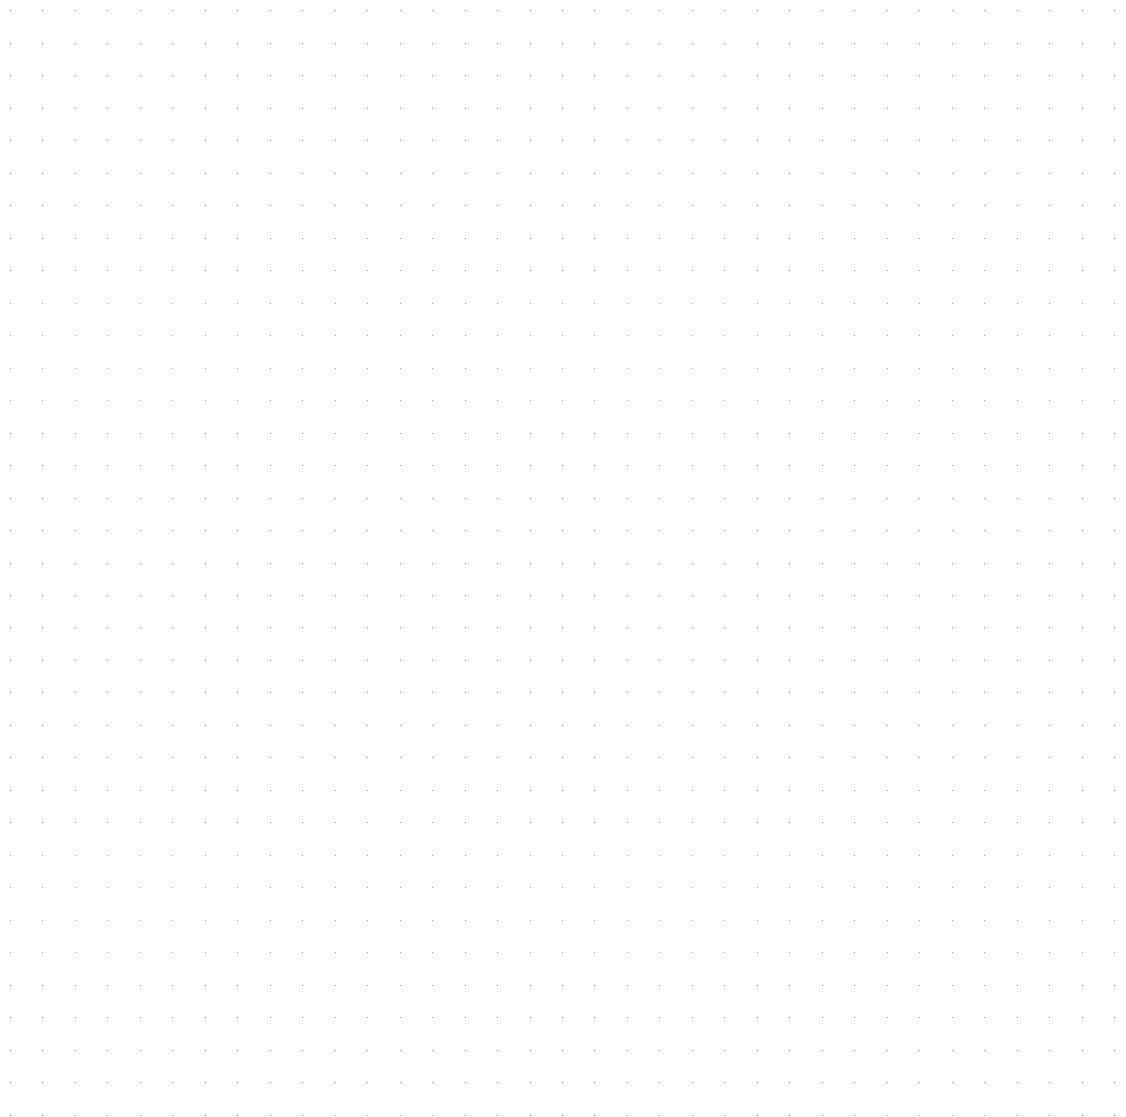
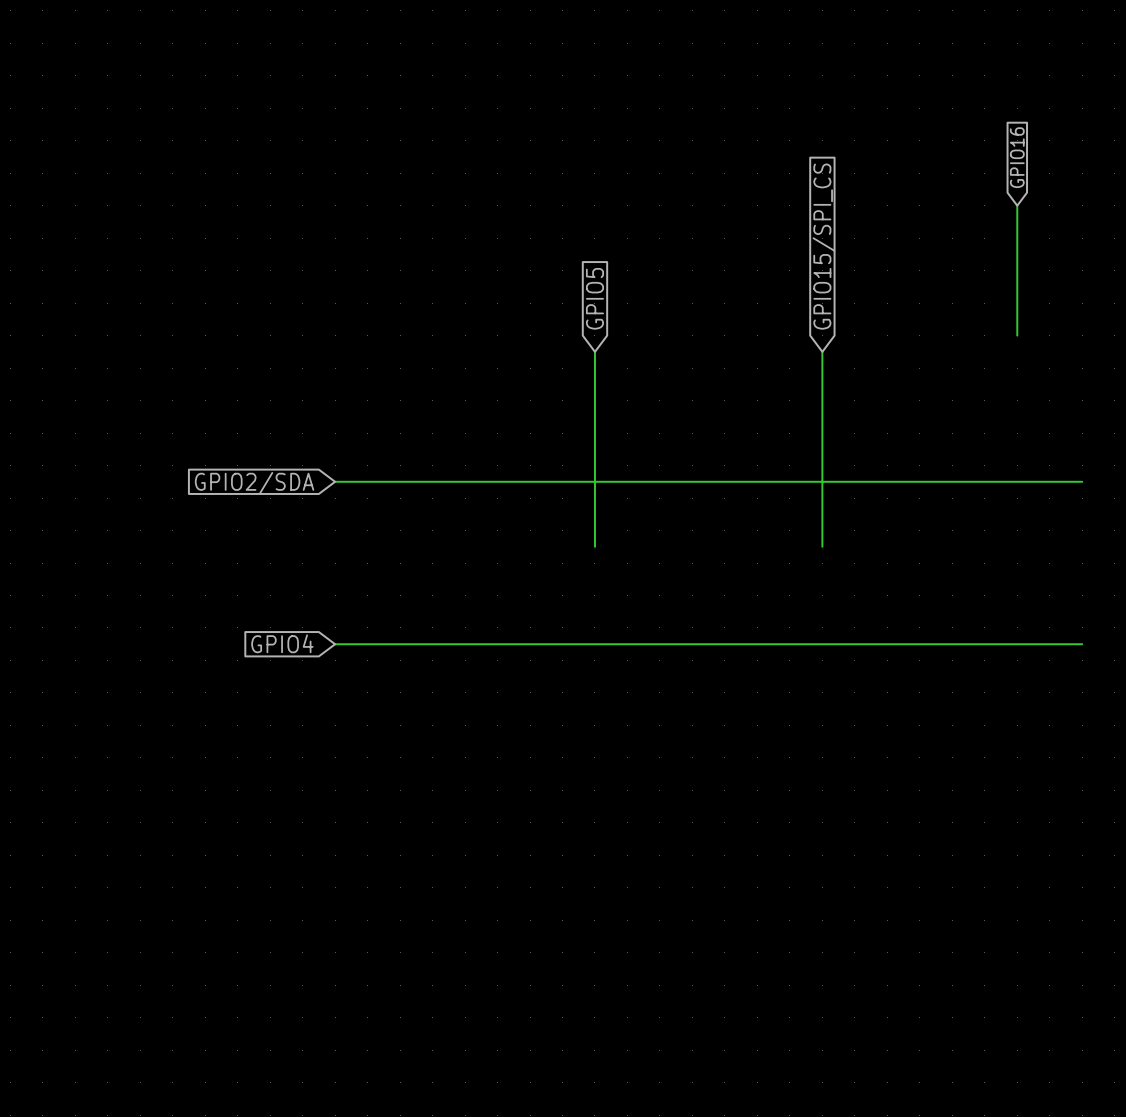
global label: none -> GPIO16 (1017, 157)
wire: none -> (1017, 205) (1017, 335)
global label: none -> GPIO15/SPI_CS (823, 246)
global label: none -> GPIO5 (594, 298)
wire: none -> (594, 351) (594, 546)
wire: none -> (822, 351) (822, 546)
wire: none -> (335, 481) (1082, 481)
global label: none -> GPIO2/SDA (254, 483)
global label: none -> GPIO4 (282, 643)
wire: none -> (335, 644) (1082, 644)

